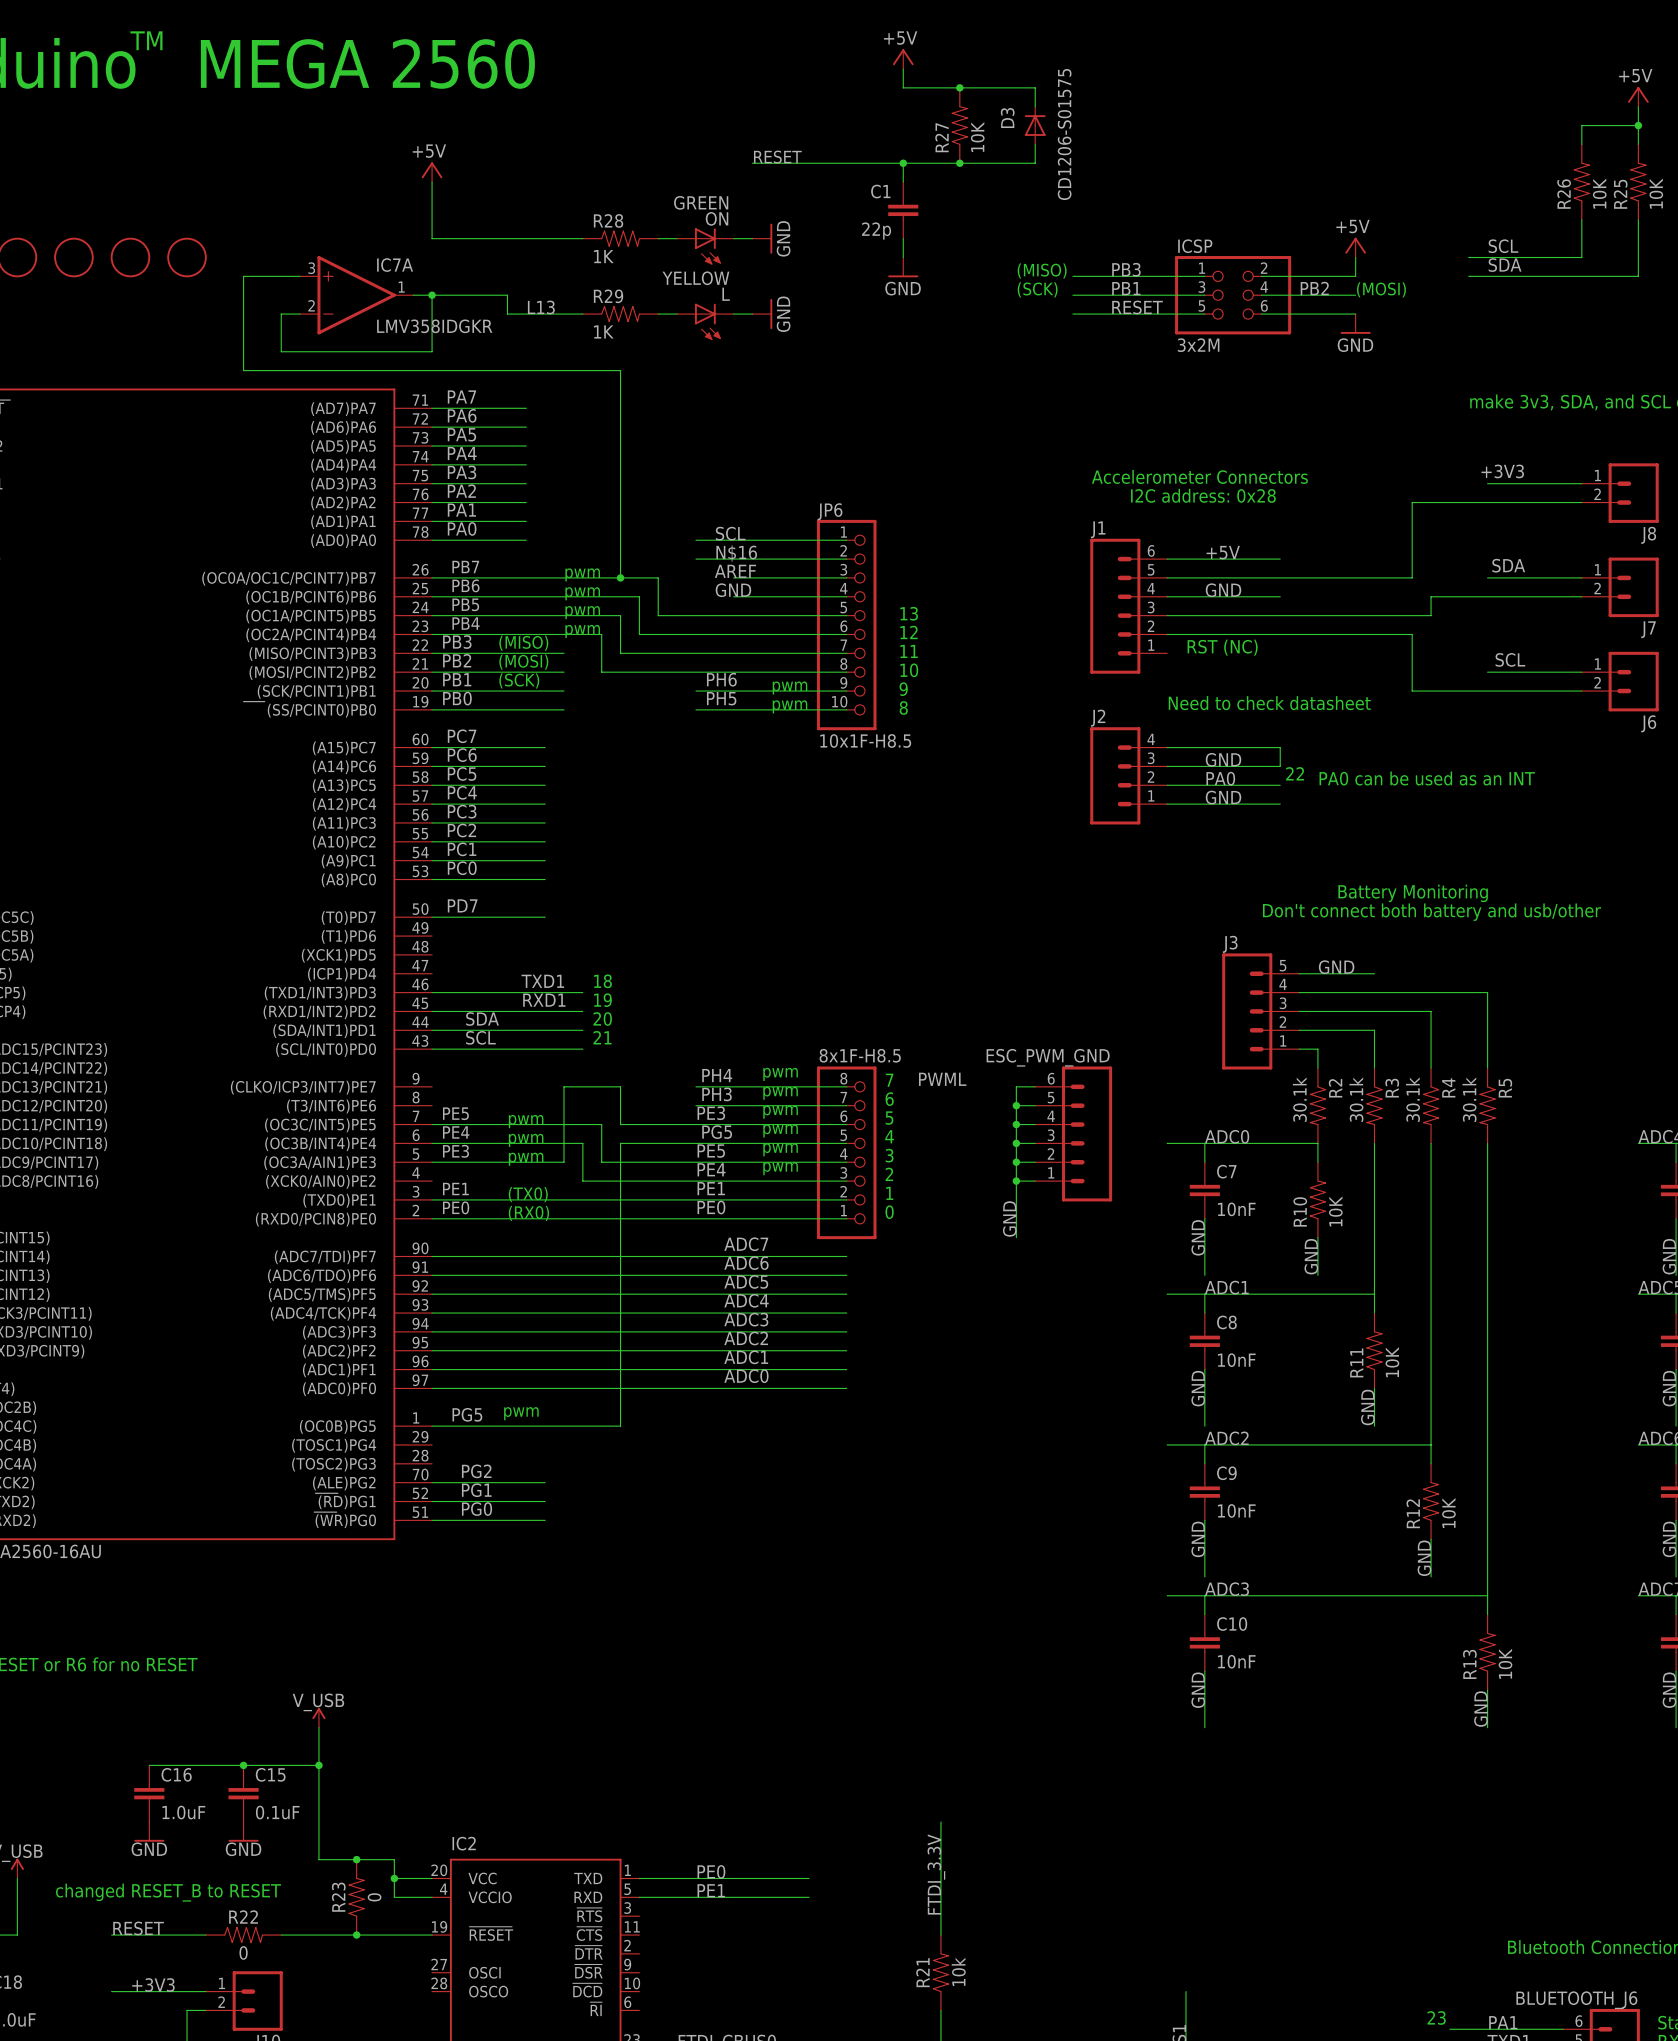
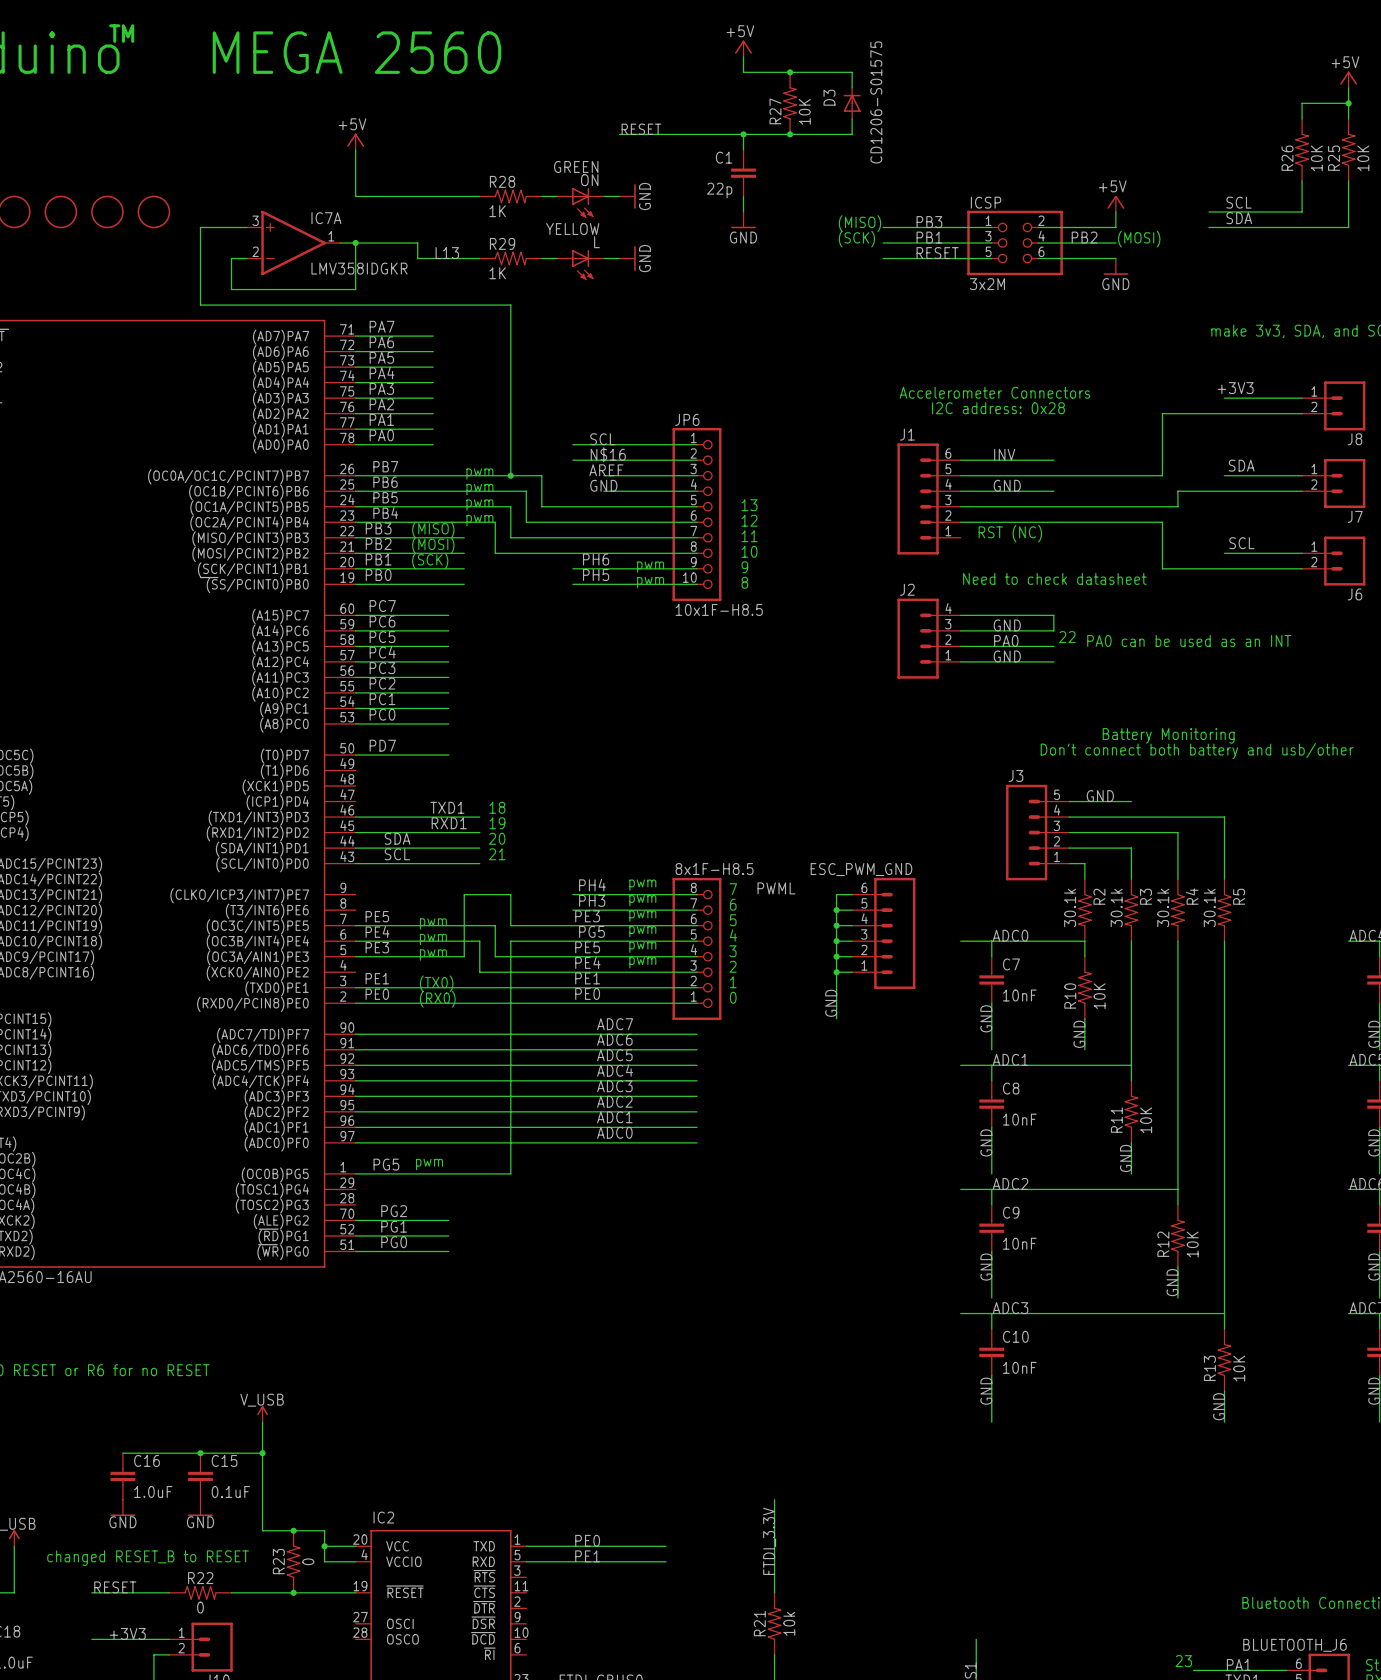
label: +5V (1223, 552) -> INV (1004, 454)

